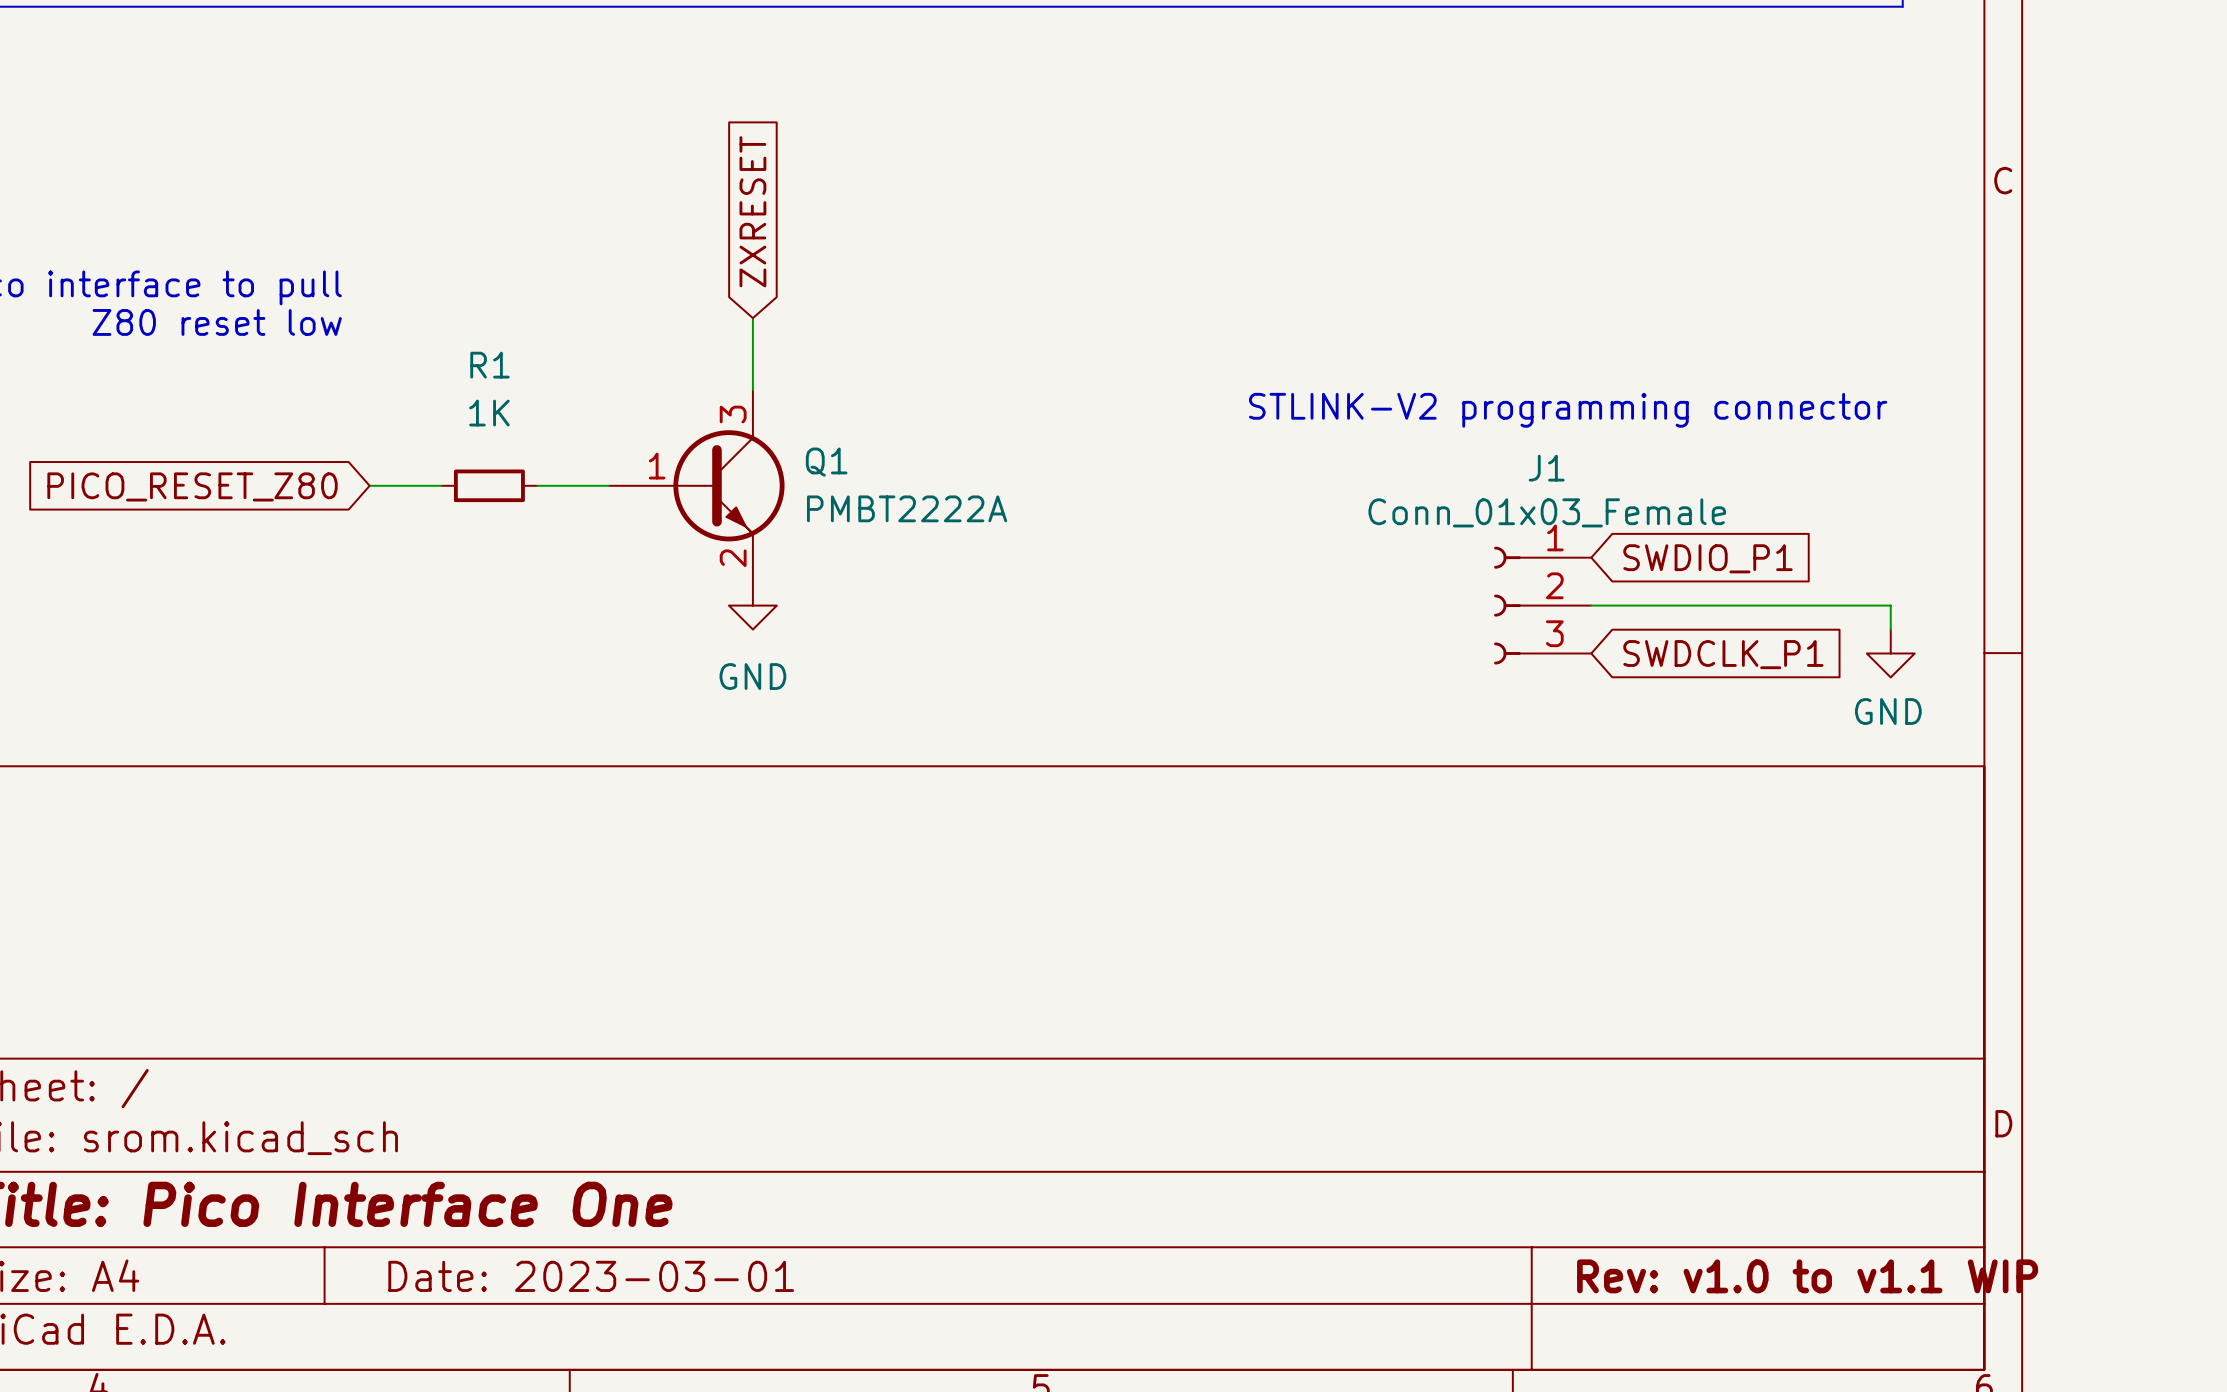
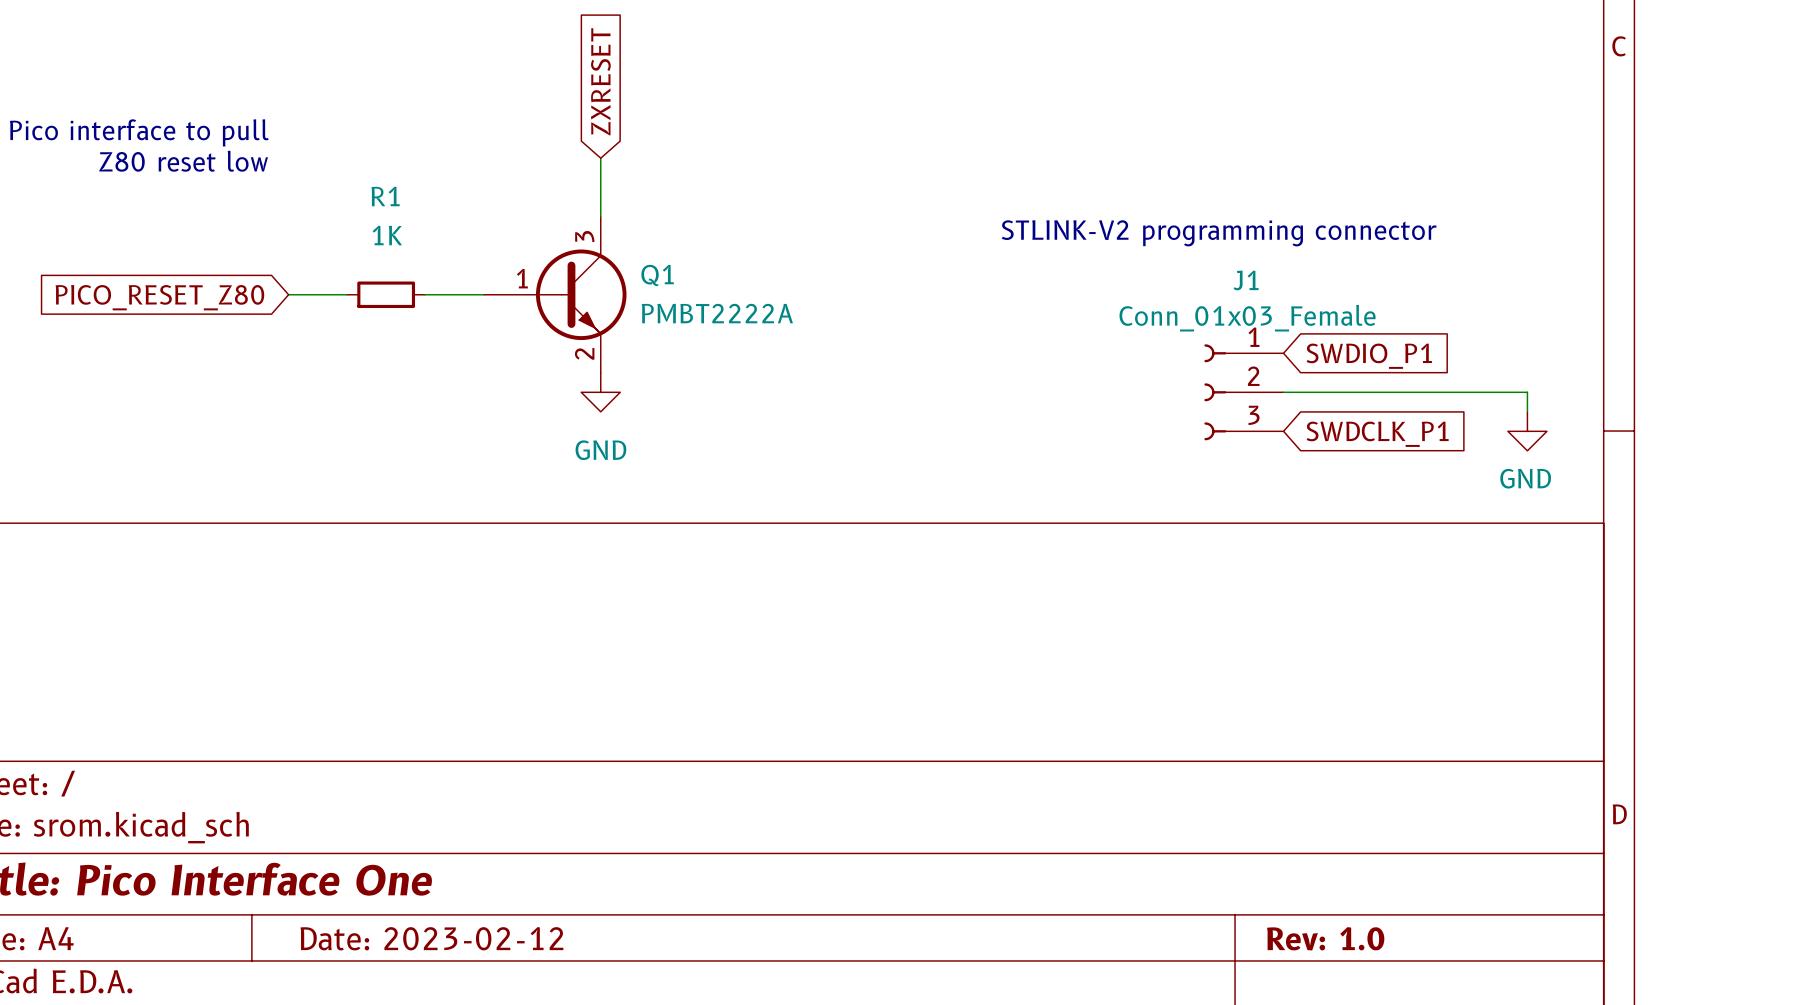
title block: Date: 2023-03-01 (591, 1276) -> Date: 2023-02-12 (431, 938)
title block: Rev: v1.0 to v1.1 WIP (1807, 1276) -> Rev: 1.0 (1325, 938)

